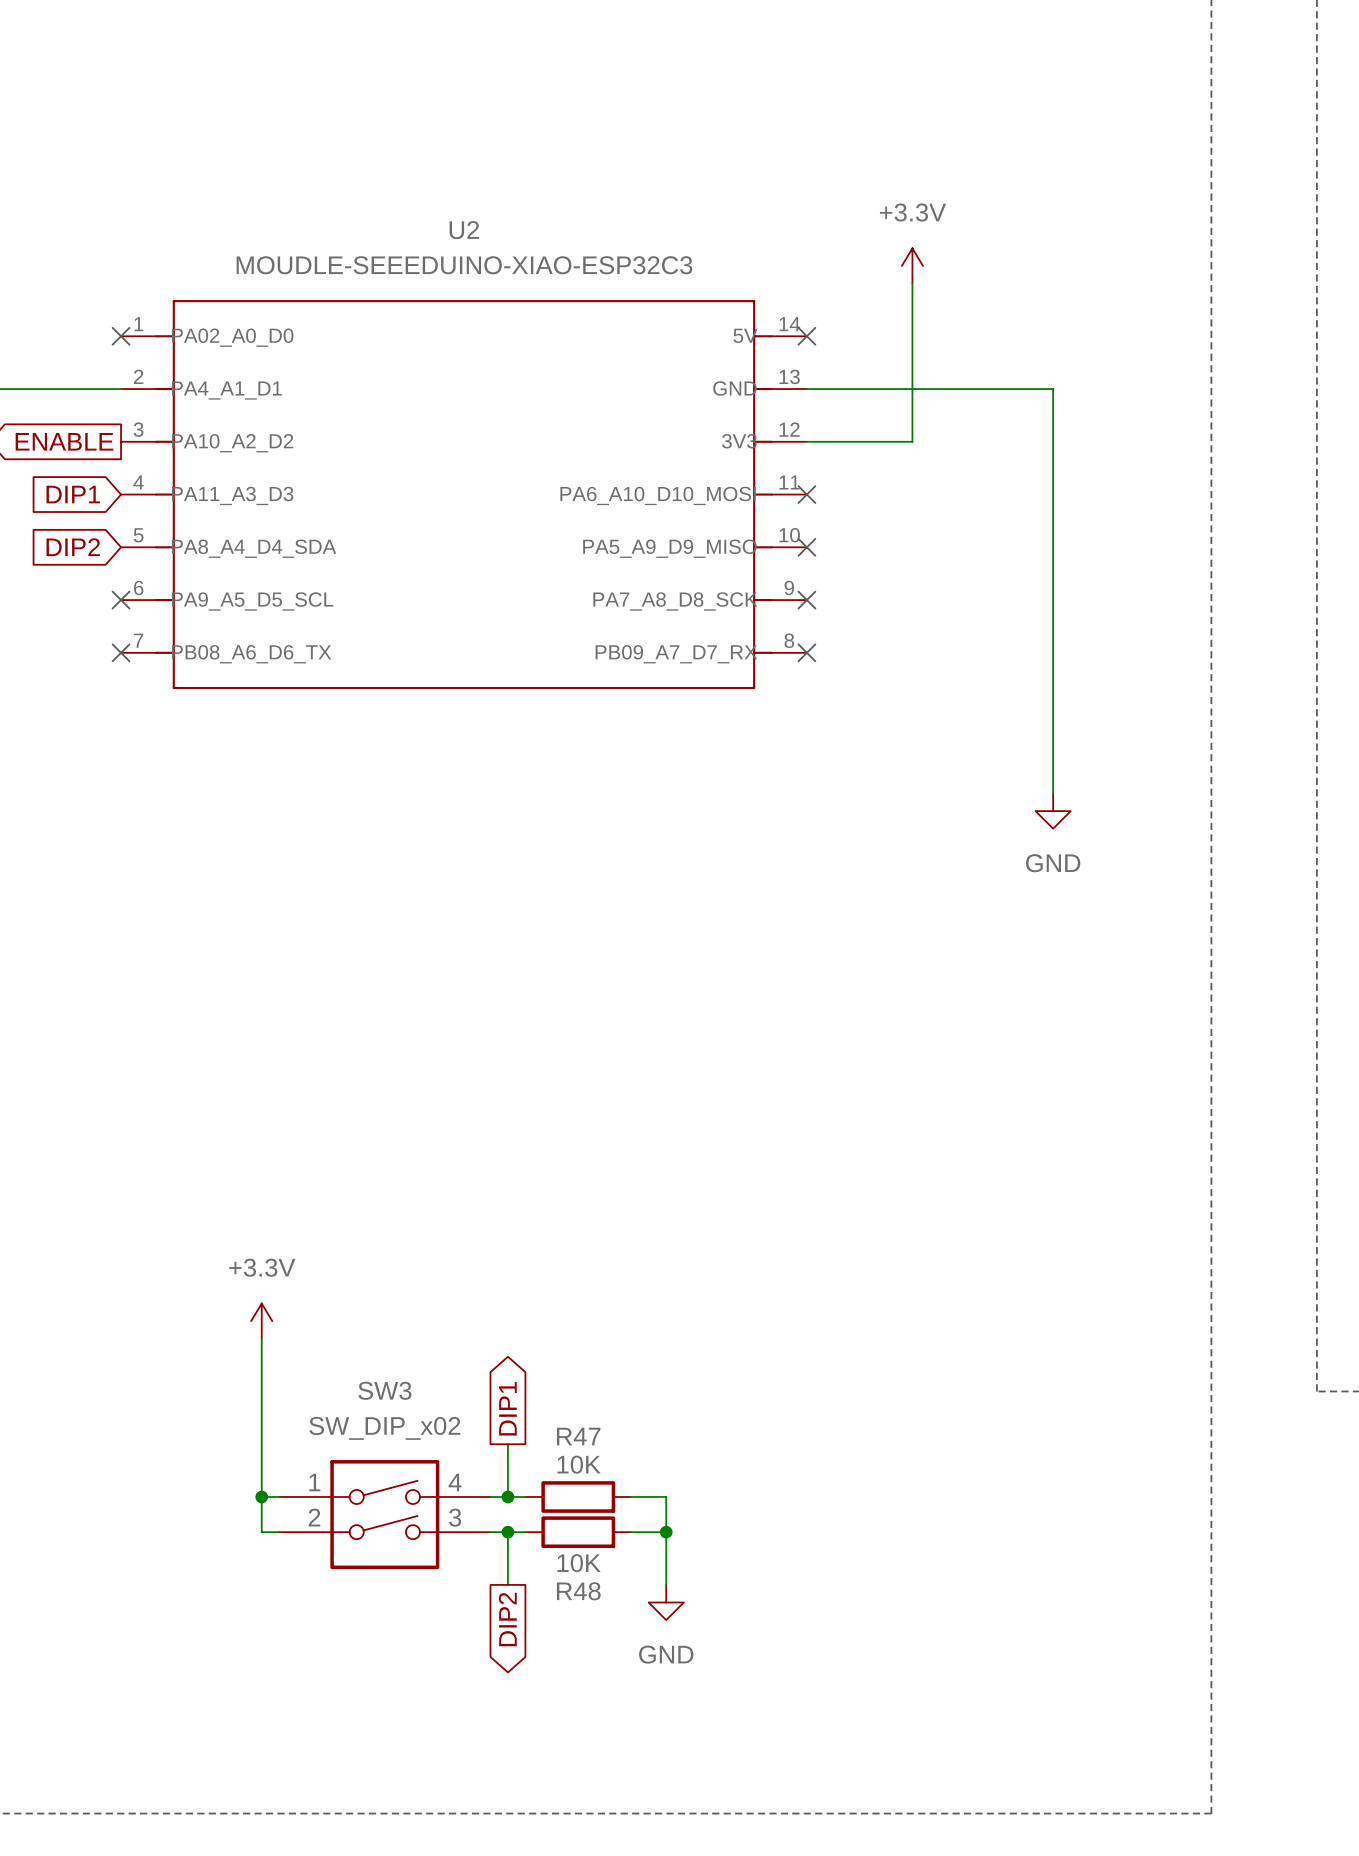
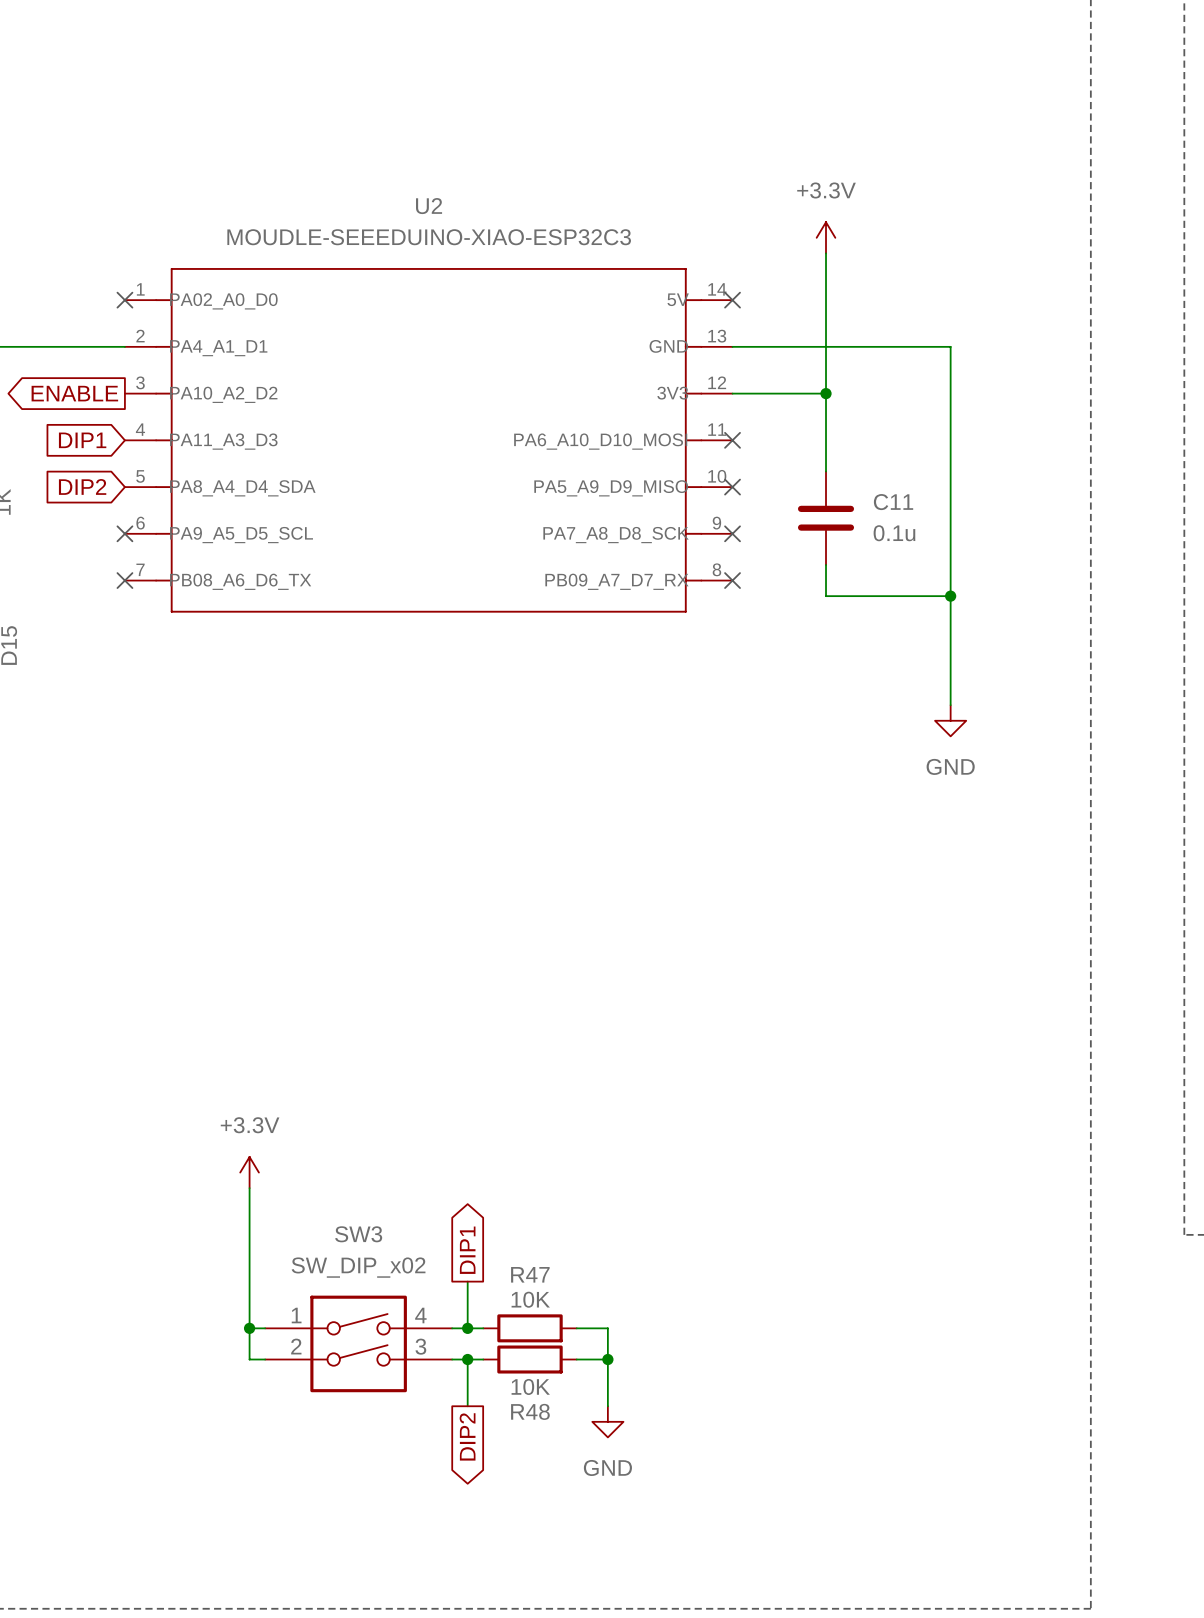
wire: none -> (826, 393) (826, 471)
junction: none -> (826, 393)
C11: none -> 0.1u (826, 518)
wire: none -> (826, 564) (826, 596) (950, 596)
junction: none -> (950, 596)

